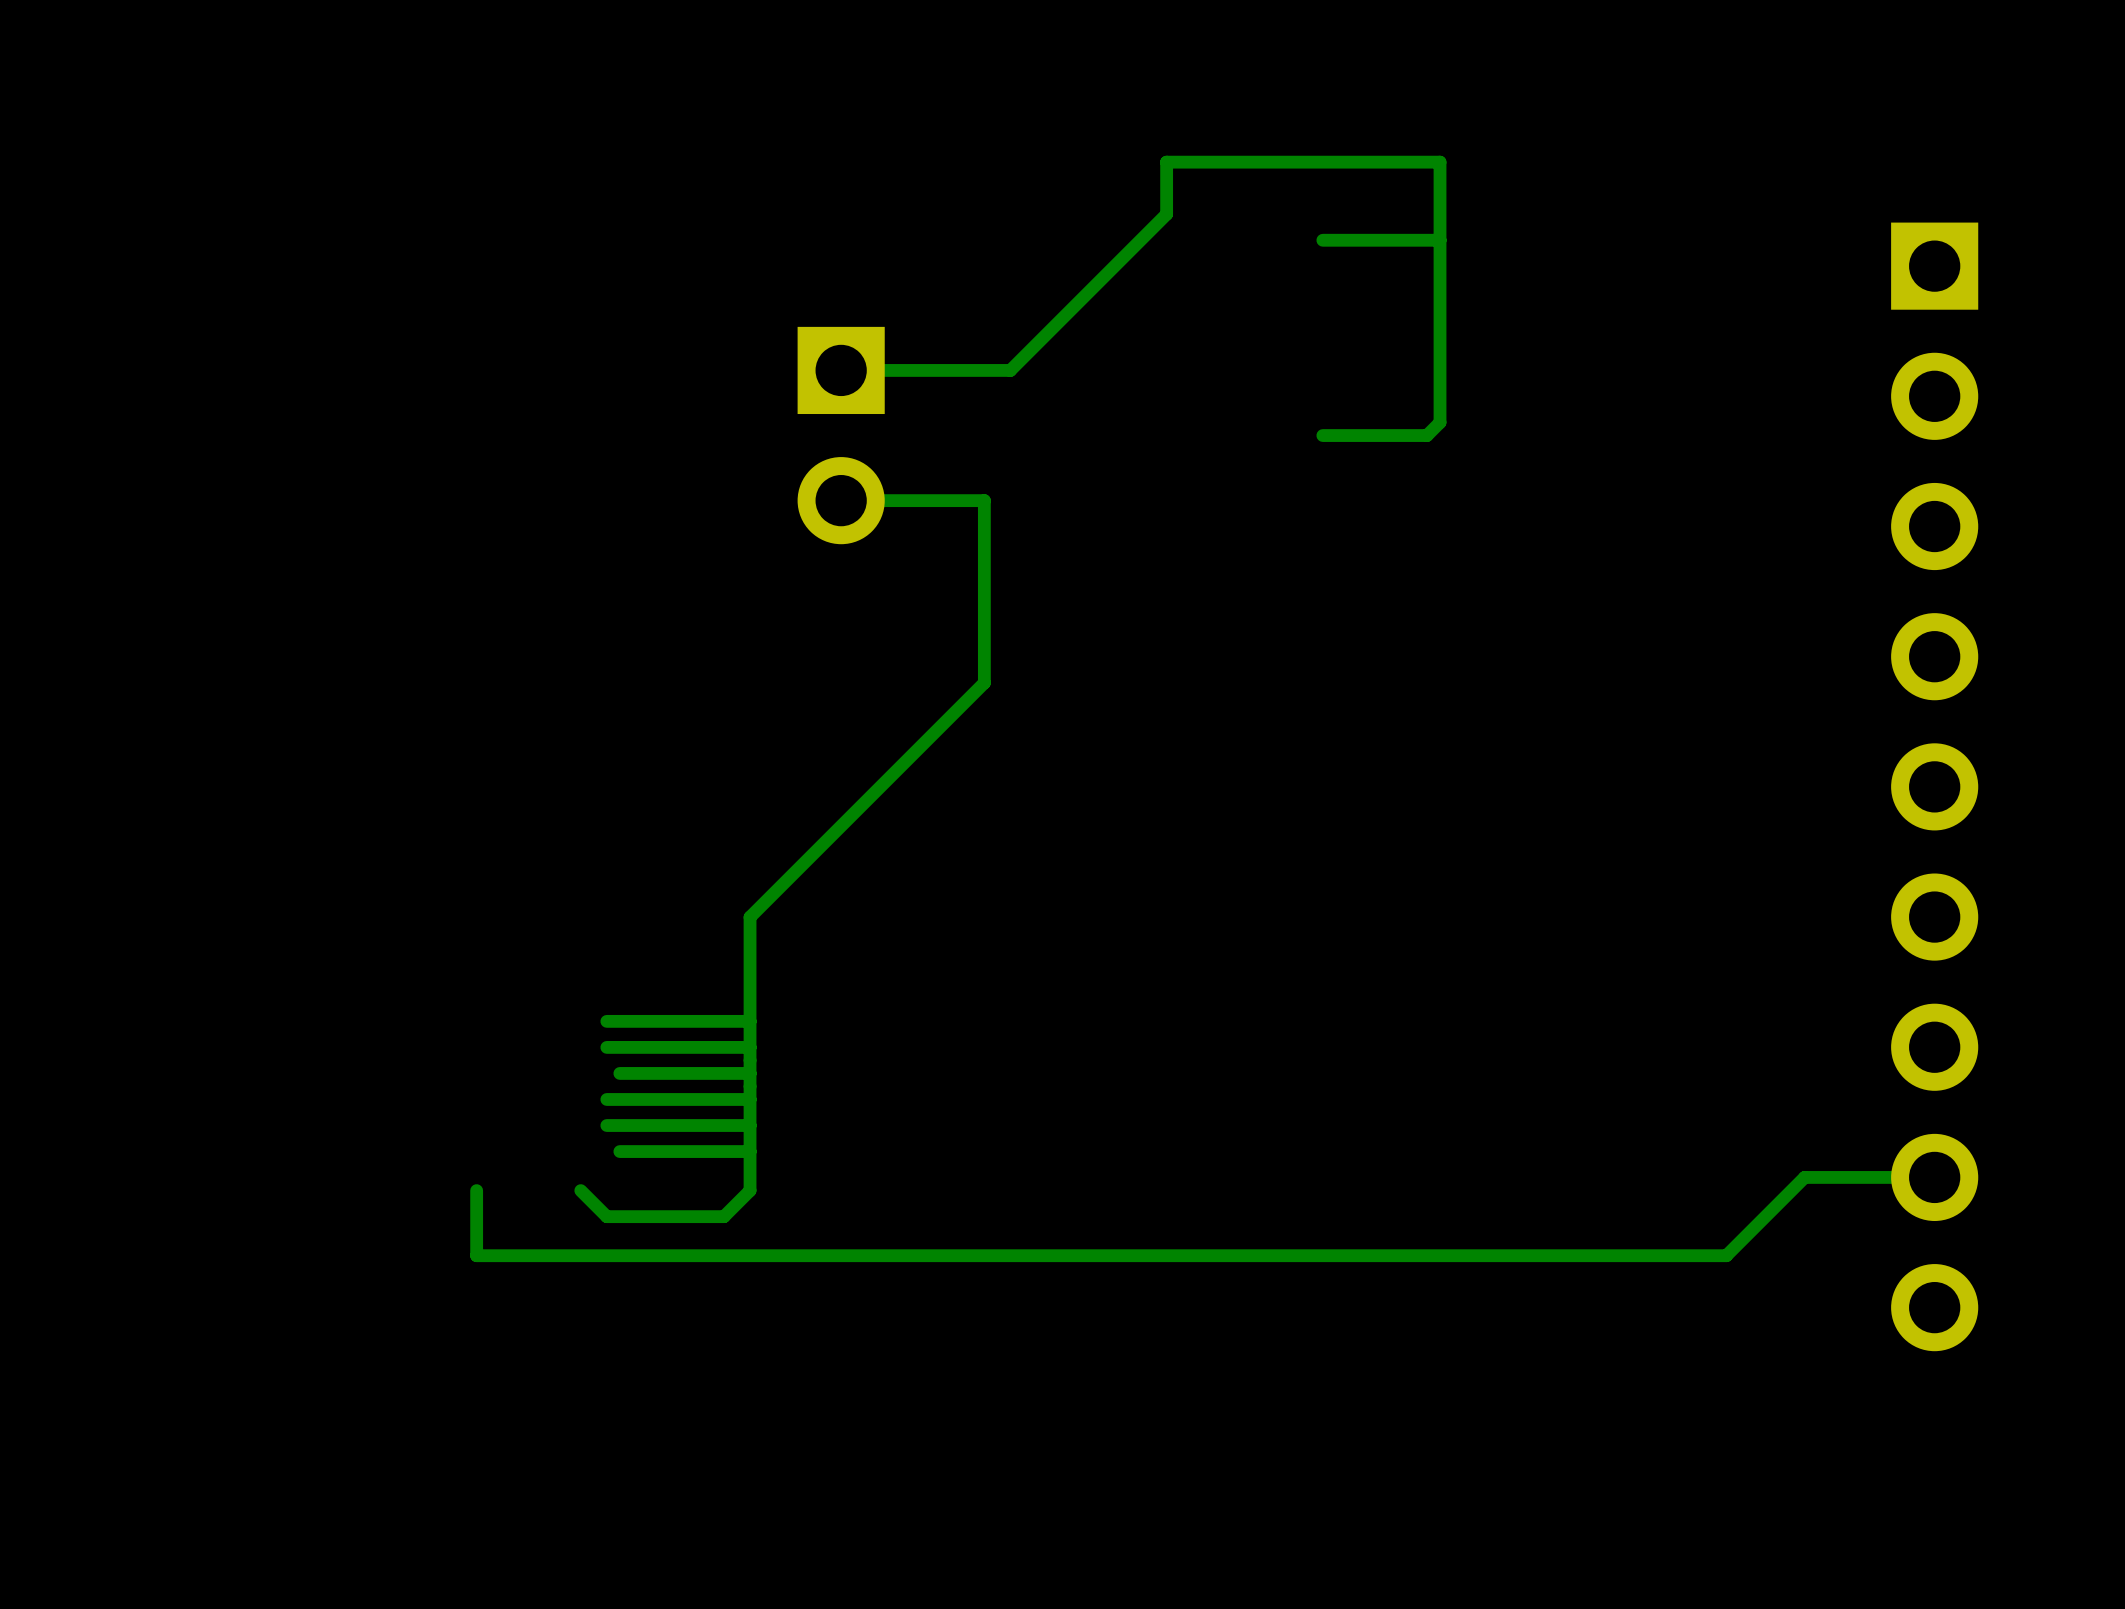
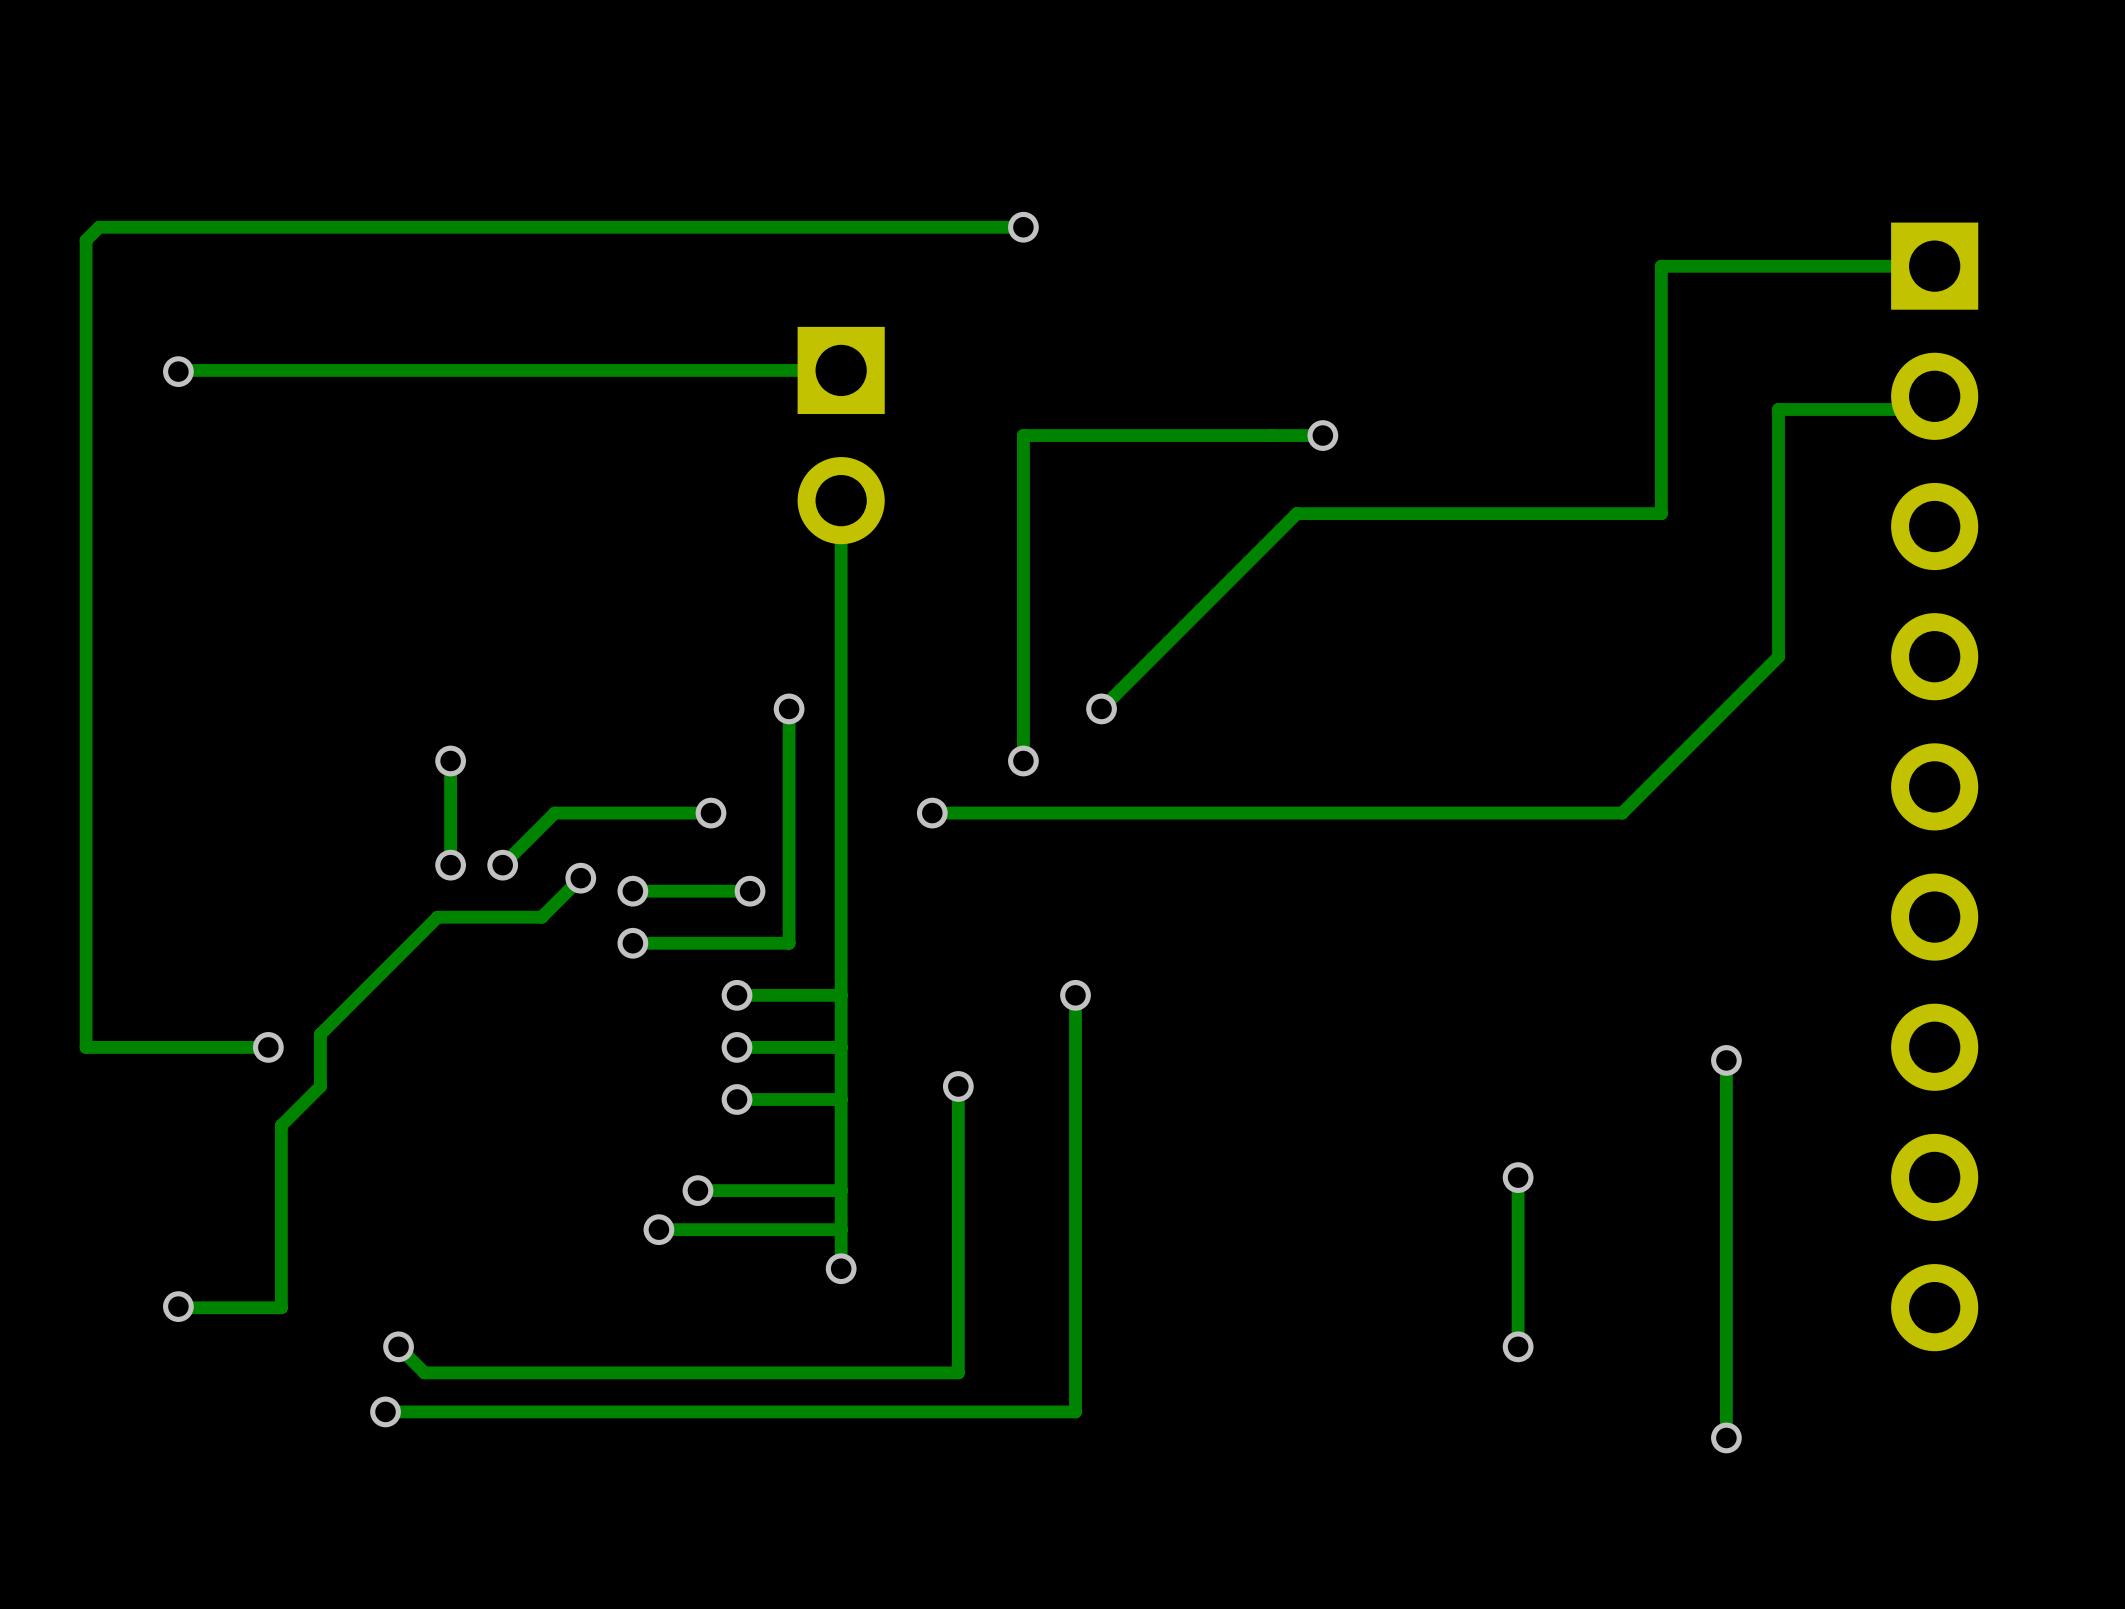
track: none -> (1023, 227) (99, 227) (86, 240) (86, 1047) (268, 1047)
via: none -> (1023, 227)
track: (1440, 240) (1322, 240) -> (750, 891) (632, 891)
track: none -> (1934, 266) (1661, 266) (1661, 513) (1296, 513) (1101, 708)
track: (841, 370) (1010, 370) (1166, 214) (1166, 162) (1440, 162) (1440, 422) (1427, 435) (1322, 435) -> (1023, 761) (1023, 435) (1322, 435)
track: none -> (841, 370) (178, 371)
via: none -> (178, 371)
track: none -> (1934, 396) (1921, 409) (1778, 409) (1778, 656) (1622, 813) (932, 813)
via: none -> (1322, 435)
track: (841, 500) (984, 500) (984, 682) (750, 917) (750, 1190) (724, 1216) (606, 1216) (580, 1190) -> (841, 500) (841, 1268)
track: none -> (789, 708) (789, 943) (632, 943)
via: none -> (789, 708)
via: none -> (1101, 708)
track: none -> (450, 761) (450, 865)
via: none -> (450, 761)
via: none -> (1023, 761)
track: none -> (710, 813) (554, 813) (502, 865)
via: none -> (710, 813)
via: none -> (932, 813)
via: none -> (450, 865)
via: none -> (502, 865)
track: none -> (580, 878) (541, 917) (437, 917) (320, 1034) (320, 1086) (281, 1125) (281, 1307) (178, 1306)
via: none -> (580, 878)
via: none -> (632, 891)
via: none -> (750, 891)
via: none -> (632, 943)
via: none -> (737, 995)
track: none -> (841, 995) (737, 995)
track: none -> (1075, 995) (1075, 1411) (385, 1411)
via: none -> (1075, 995)
track: (750, 1021) (606, 1021) -> none
via: none -> (268, 1047)
track: (737, 1047) (606, 1047) -> none
via: none -> (737, 1047)
track: none -> (841, 1047) (750, 1047)
track: none -> (1726, 1060) (1726, 1437)
via: none -> (1726, 1060)
track: (750, 1073) (619, 1073) -> none
track: none -> (958, 1086) (958, 1372) (424, 1372) (398, 1346)
via: none -> (958, 1086)
track: (737, 1099) (606, 1099) -> none
via: none -> (737, 1099)
track: none -> (841, 1099) (750, 1099)
track: (750, 1125) (606, 1125) -> (841, 1190) (697, 1190)
track: (750, 1151) (619, 1151) -> none
track: none -> (1518, 1177) (1518, 1346)
via: none -> (1518, 1177)
track: (1934, 1177) (1804, 1177) (1726, 1255) (476, 1255) (476, 1190) -> none
via: none -> (697, 1190)
via: none -> (658, 1229)
track: none -> (841, 1229) (658, 1229)
via: none -> (841, 1268)
via: none -> (178, 1306)
via: none -> (398, 1346)
via: none -> (1518, 1346)
via: none -> (385, 1411)
via: none -> (1726, 1437)

